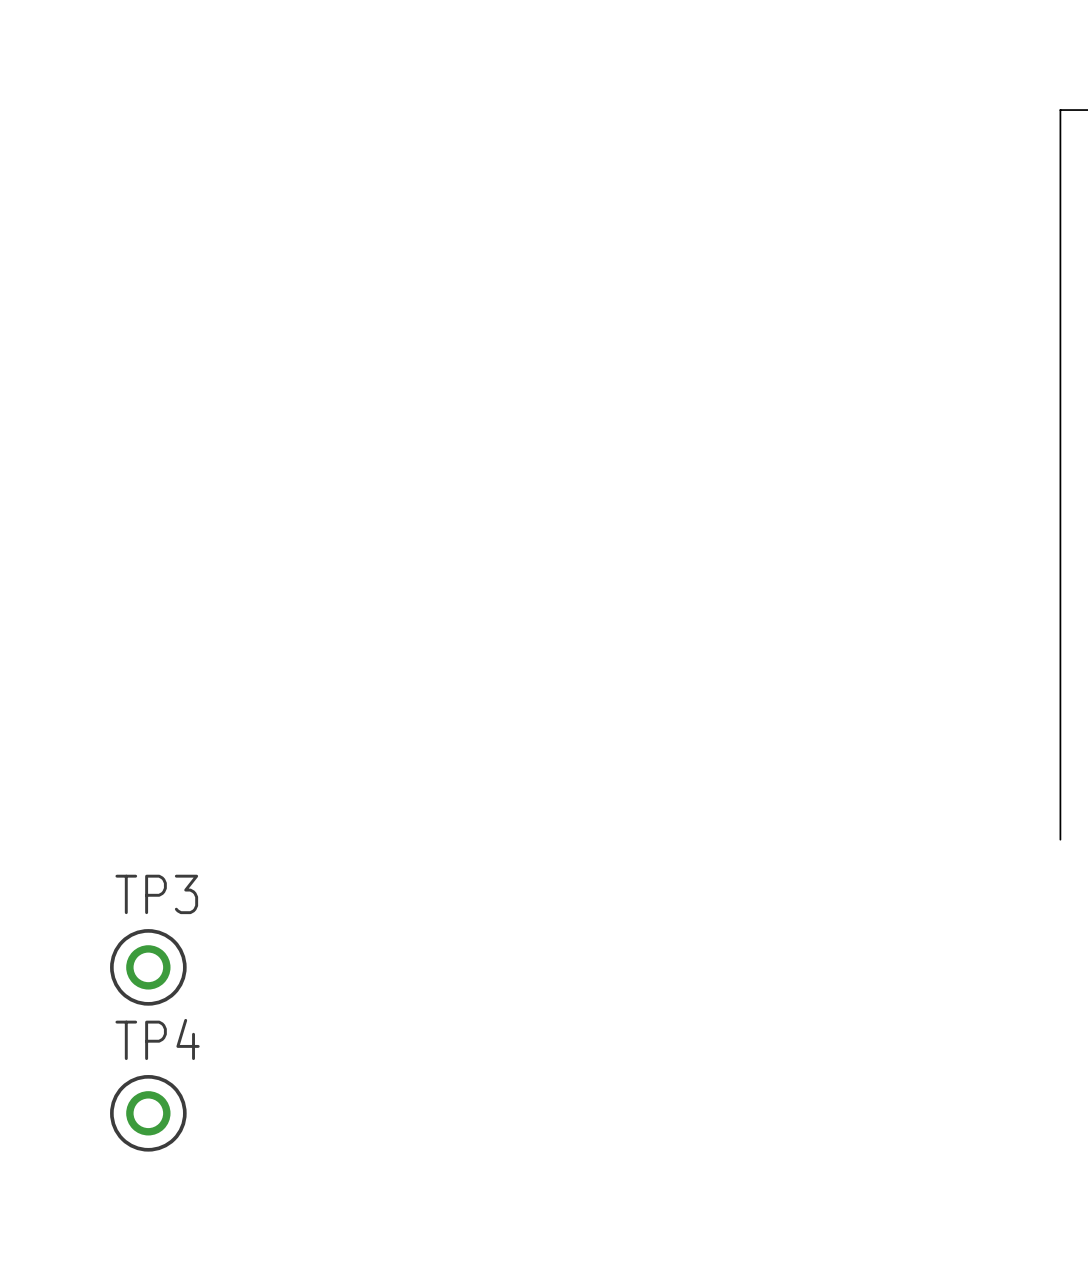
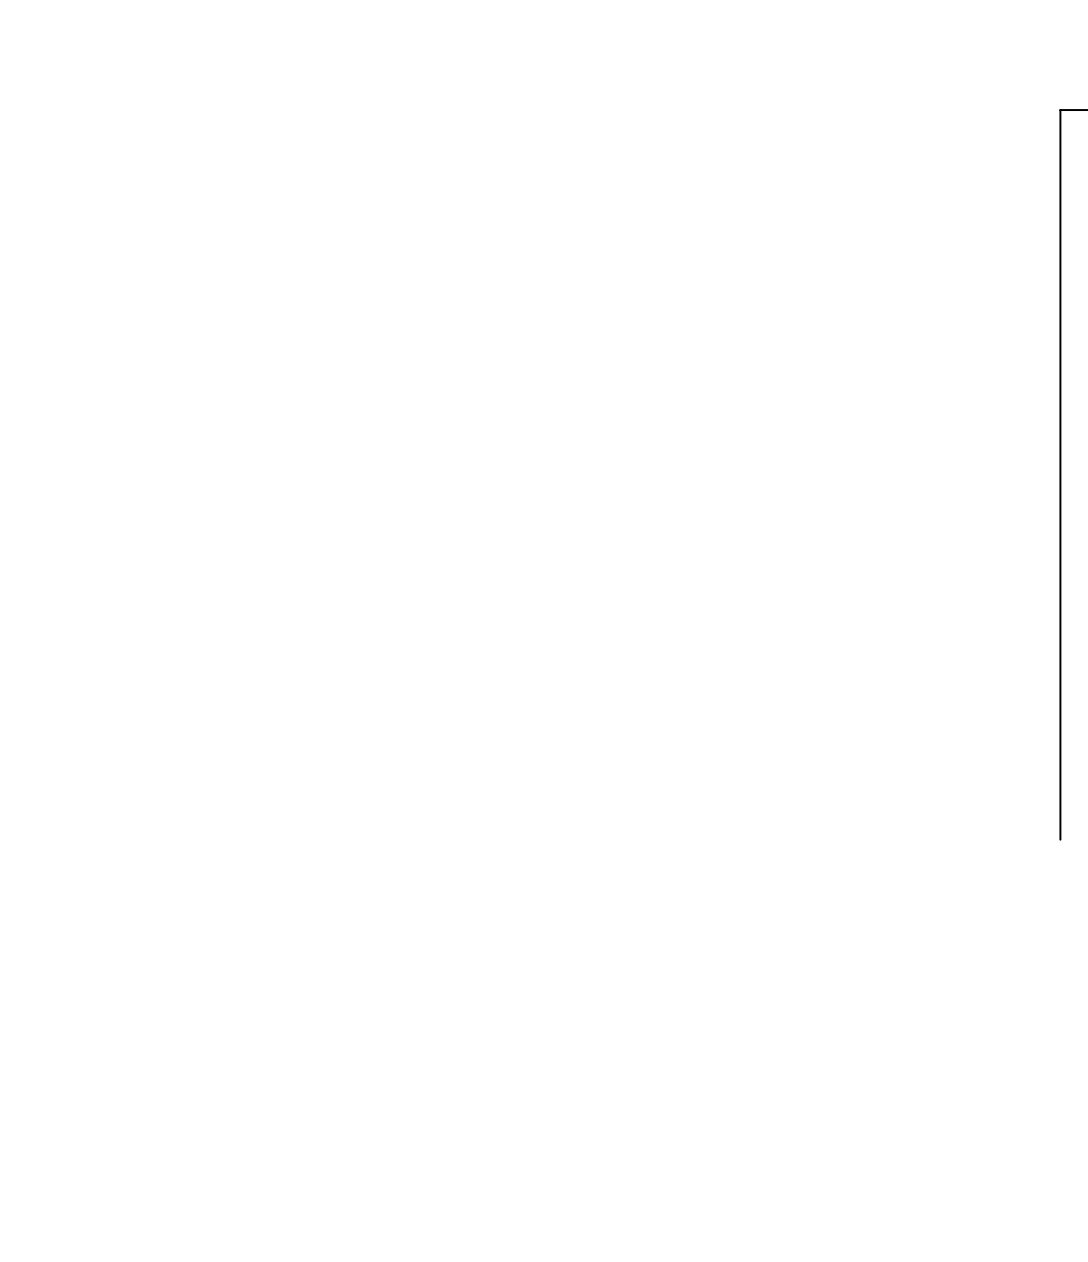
TP3: (148, 967) -> none
TP4: (148, 1113) -> none

